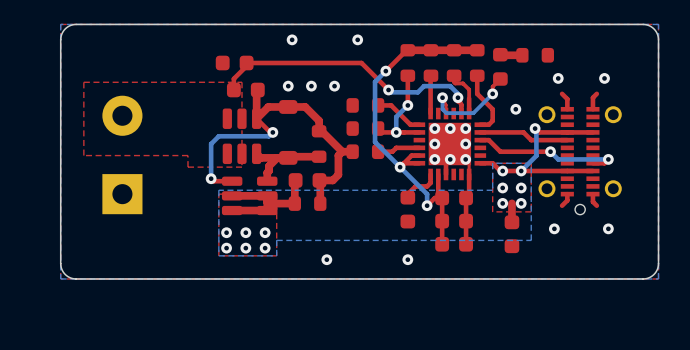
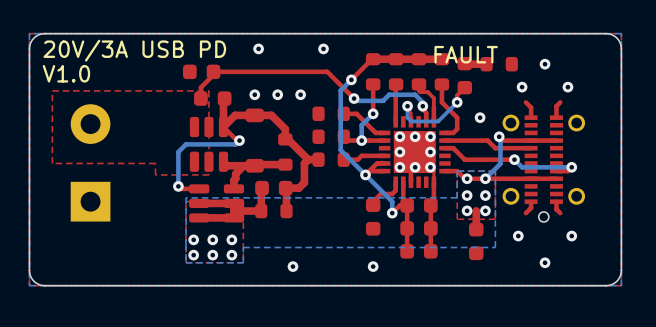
text: none -> 20V/3A USB PD (134, 50)
text: none -> FAULT (466, 54)
via: none -> (545, 64)
text: none -> V1.0 (66, 73)
via: none -> (545, 262)

